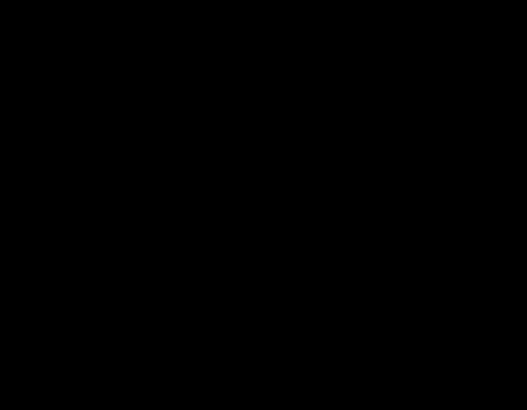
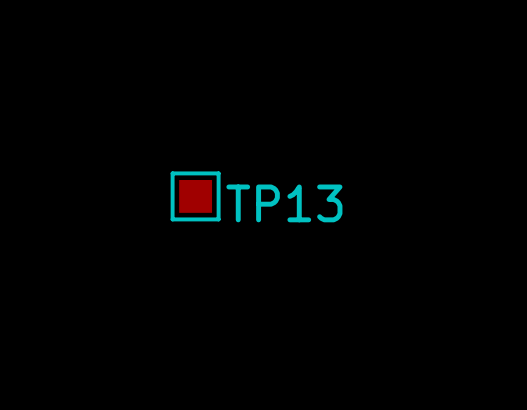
TP13: none -> (195, 196)

